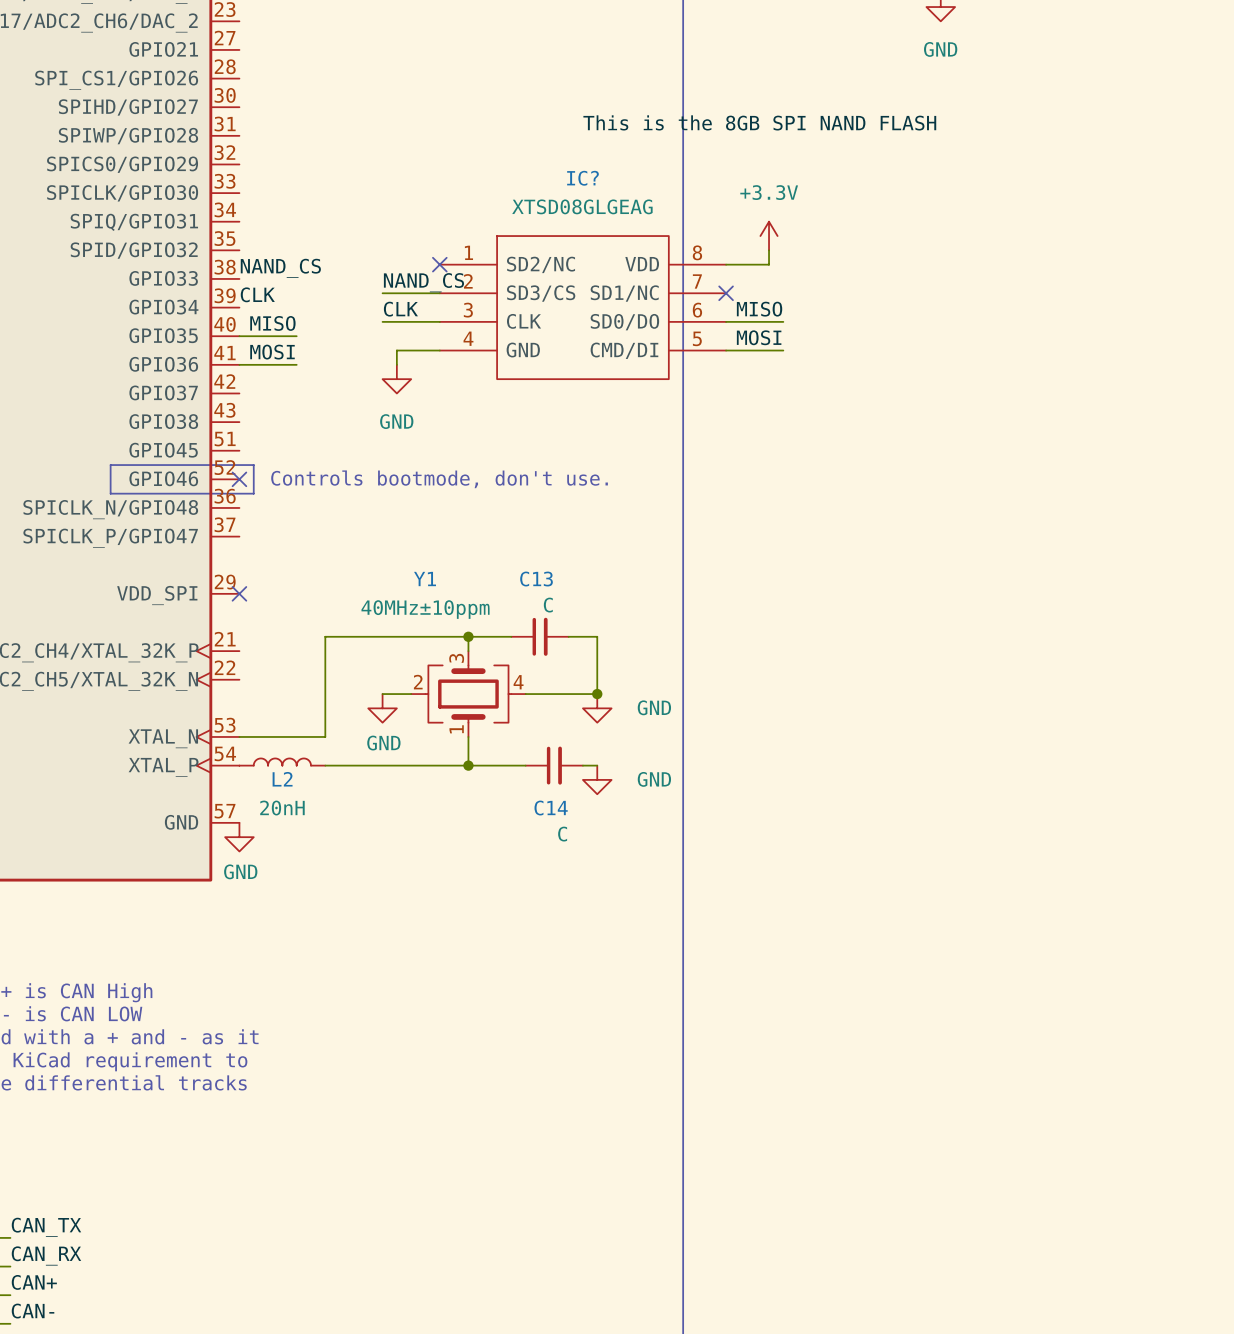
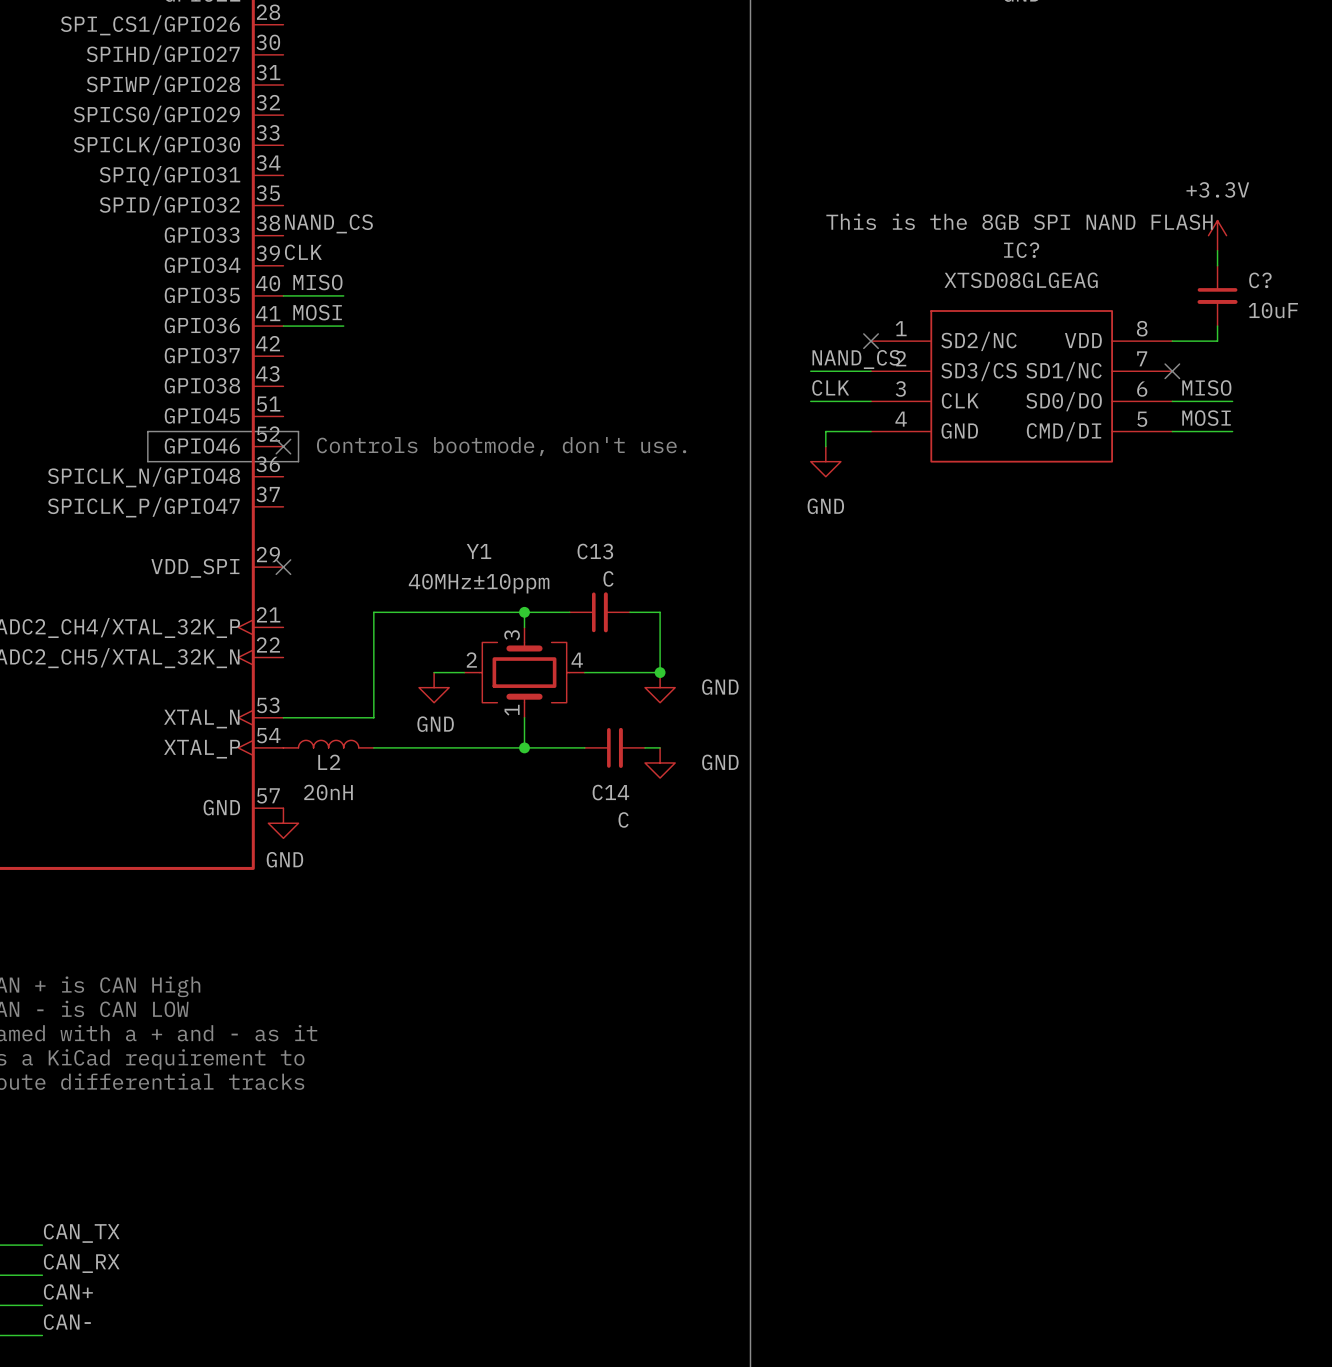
label position: This is the 8GB SPI NAND FLASH (759, 122) -> This is the 8GB SPI NAND FLASH (1019, 221)
power symbol: +3.3V (769, 236) -> none
wire: (769, 250) (769, 264) (726, 264) -> none
no-connect mark: (439, 264) -> none
power symbol: none -> +3.3V (1217, 235)
label: NAND_CS (423, 282) -> none
wire: (382, 293) (439, 293) -> none
no-connect mark: (726, 293) -> none
wire: none -> (1217, 250) (1217, 265)
IC?: XTSD08GLGEAG (582, 307) -> none
label: CLK (400, 309) -> none
label: MISO (759, 309) -> none
wire: (382, 321) (439, 321) -> none
wire: (726, 321) (783, 321) -> (810, 371) (871, 371)
C?: none -> 10uF (1217, 295)
label: MOSI (759, 337) -> none
wire: (439, 350) (396, 350) (396, 364) -> none
wire: (726, 350) (783, 350) -> (810, 401) (871, 401)
wire: none -> (1217, 326) (1217, 341) (1172, 341)
power symbol: GND (396, 379) -> none
no-connect mark: none -> (871, 341)
label: none -> NAND_CS (856, 359)
no-connect mark: none -> (1172, 371)
IC?: none -> XTSD08GLGEAG (1021, 386)
label: none -> CLK (830, 387)
label: none -> MISO (1206, 387)
wire: none -> (1172, 401) (1232, 401)
label: none -> MOSI (1206, 418)
wire: none -> (871, 431) (825, 431) (825, 446)
wire: none -> (1172, 431) (1232, 431)
power symbol: none -> GND (825, 461)

